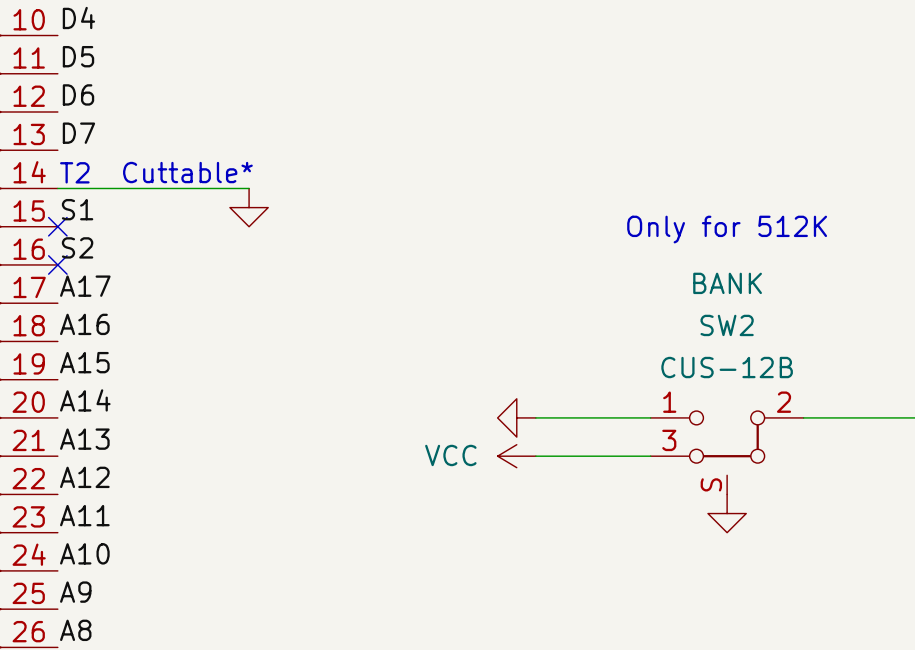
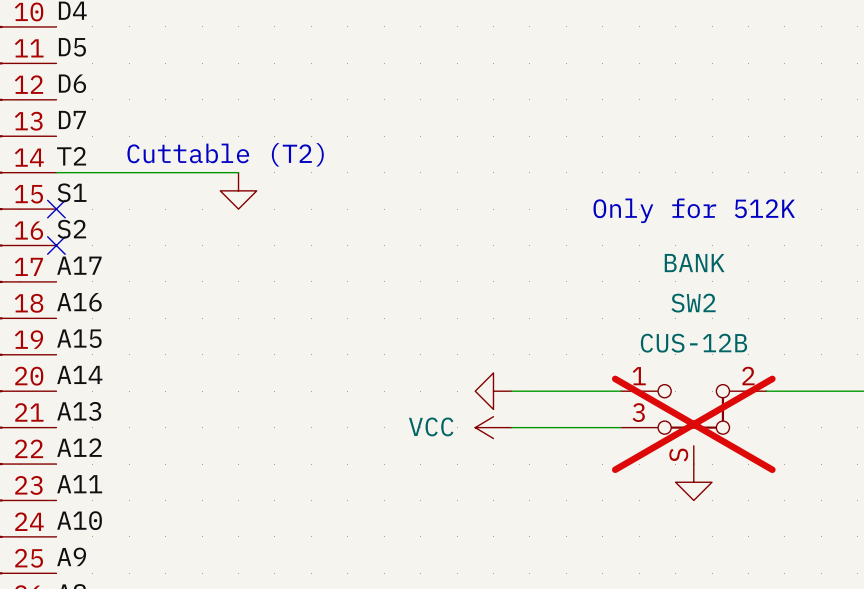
label: none -> T2 (71, 156)
text: T2 (74, 172) -> none
text: Cuttable* (187, 172) -> Cuttable (T2) (225, 154)
SW2 do-not-place cross: none -> (693, 424)

